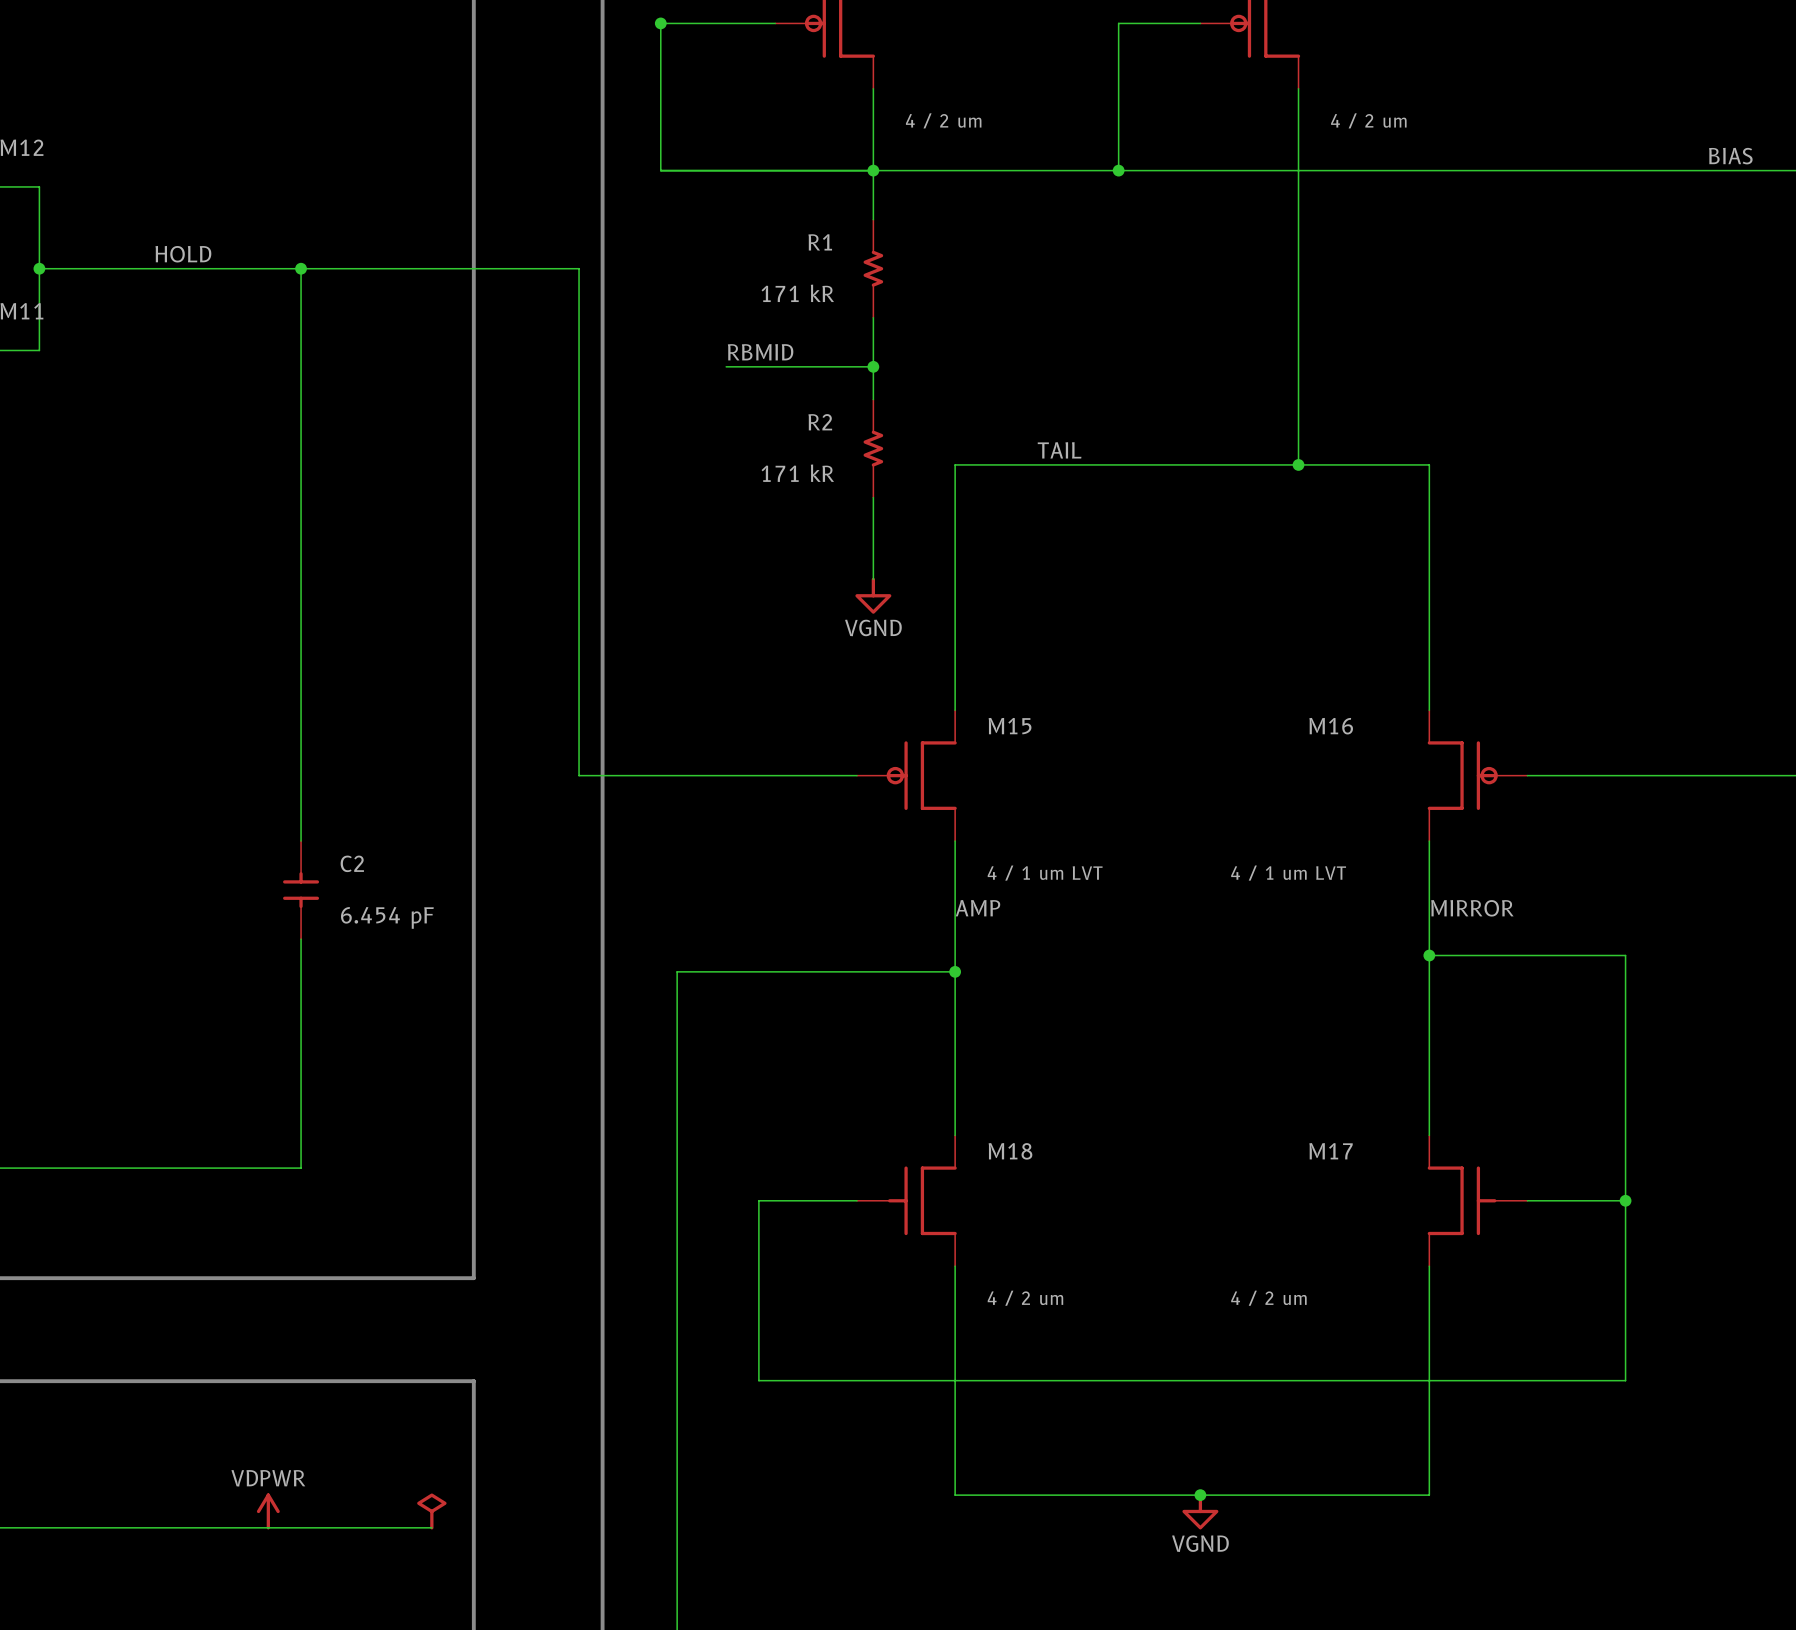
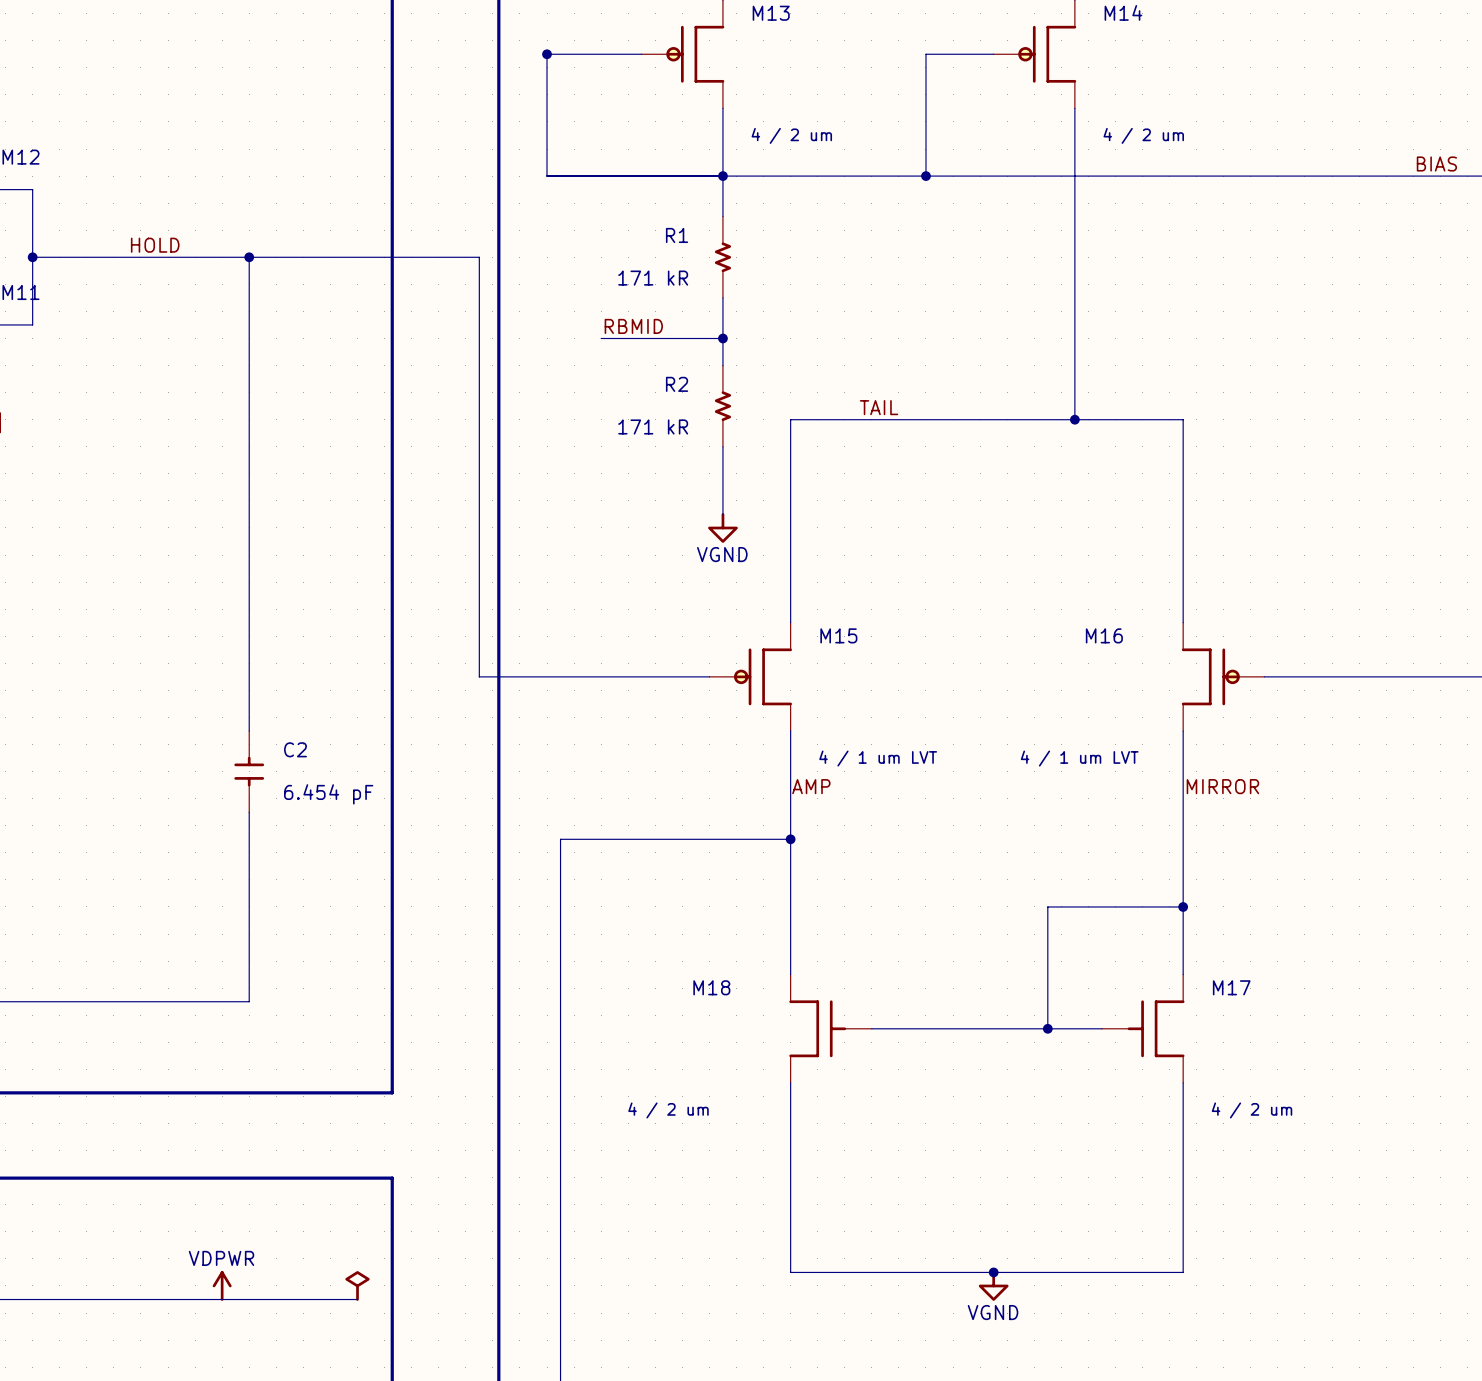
wire: (1429, 955) (1625, 955) (1625, 1380) (758, 1380) (758, 1200) (857, 1200) -> none
junction: (1429, 955) -> none
wire: none -> (1183, 906) (1047, 906) (1047, 1028)
junction: none -> (1183, 906)
M18 name position: M18 (1010, 1151) -> M18 (711, 987)
M17 name position: M17 (1331, 1151) -> M17 (1231, 987)
M18 position: (906, 1200) -> (830, 1028)
M18 rotation: 0° (922, 1200) -> 180° (817, 1028)
wire: none -> (871, 1028) (1101, 1028)
junction: none -> (1047, 1028)
M17 rotation: 0° (1462, 1200) -> 180° (1156, 1028)
M17 position: (1477, 1200) -> (1143, 1028)
wire: (1527, 1200) (1625, 1200) -> none
junction: (1625, 1200) -> none
M18 value position: 4 / 2 um (1025, 1298) -> 4 / 2 um (668, 1110)
M17 value position: 4 / 2 um (1268, 1298) -> 4 / 2 um (1252, 1110)

